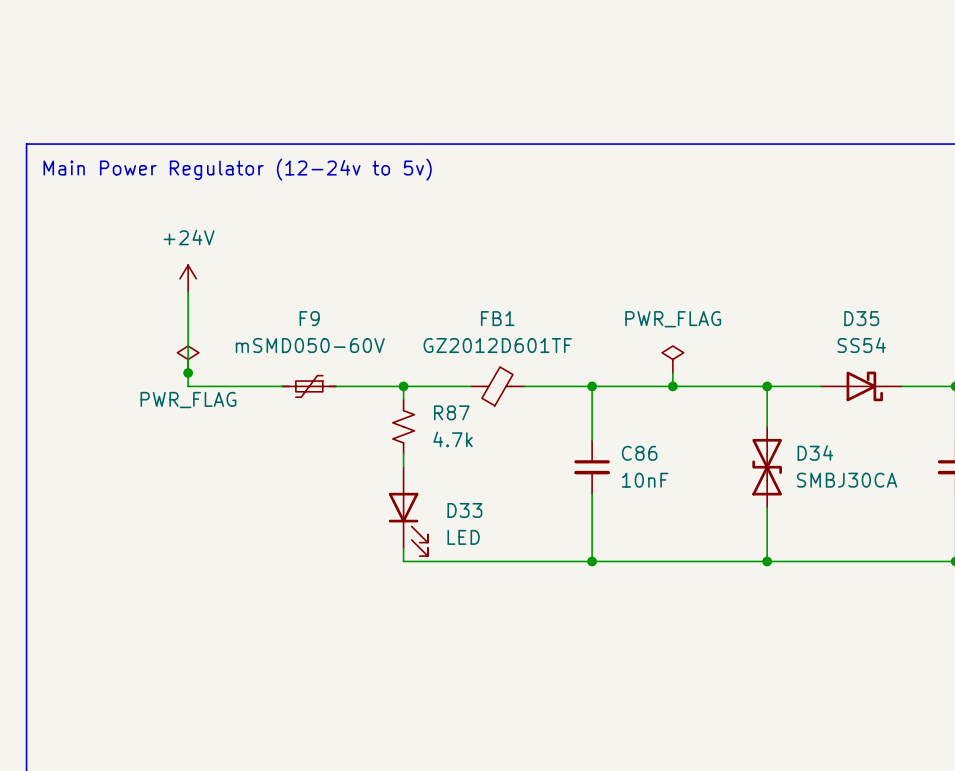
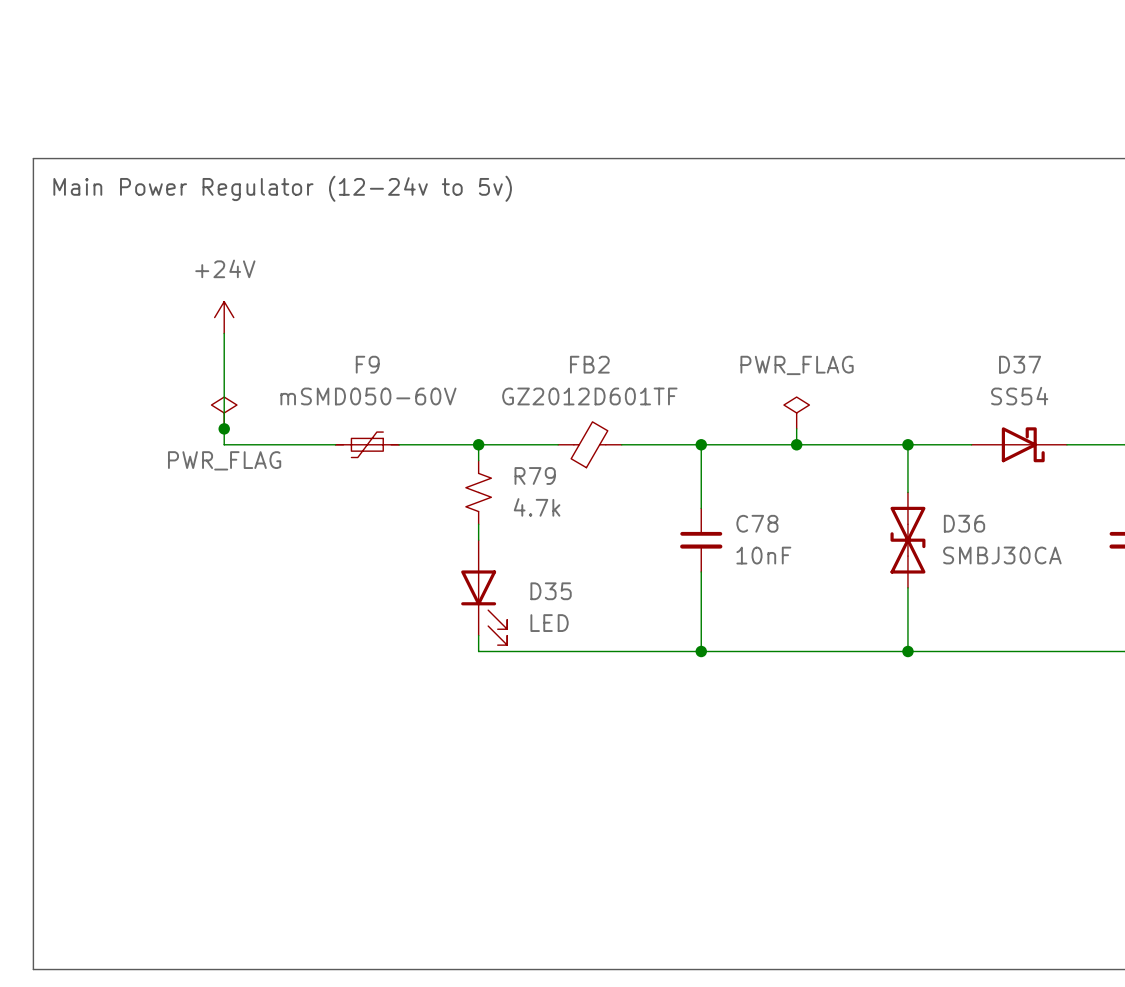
FB1 name: FB1 (497, 318) -> FB2 (589, 364)
D35 name: D35 (861, 318) -> D37 (1020, 364)
R87 name: R87 (451, 412) -> R79 (535, 475)
D34 name: D34 (815, 452) -> D36 (964, 523)
C86 name: C86 (639, 453) -> C78 (757, 523)
D33 name: D33 (464, 510) -> D35 (551, 591)

